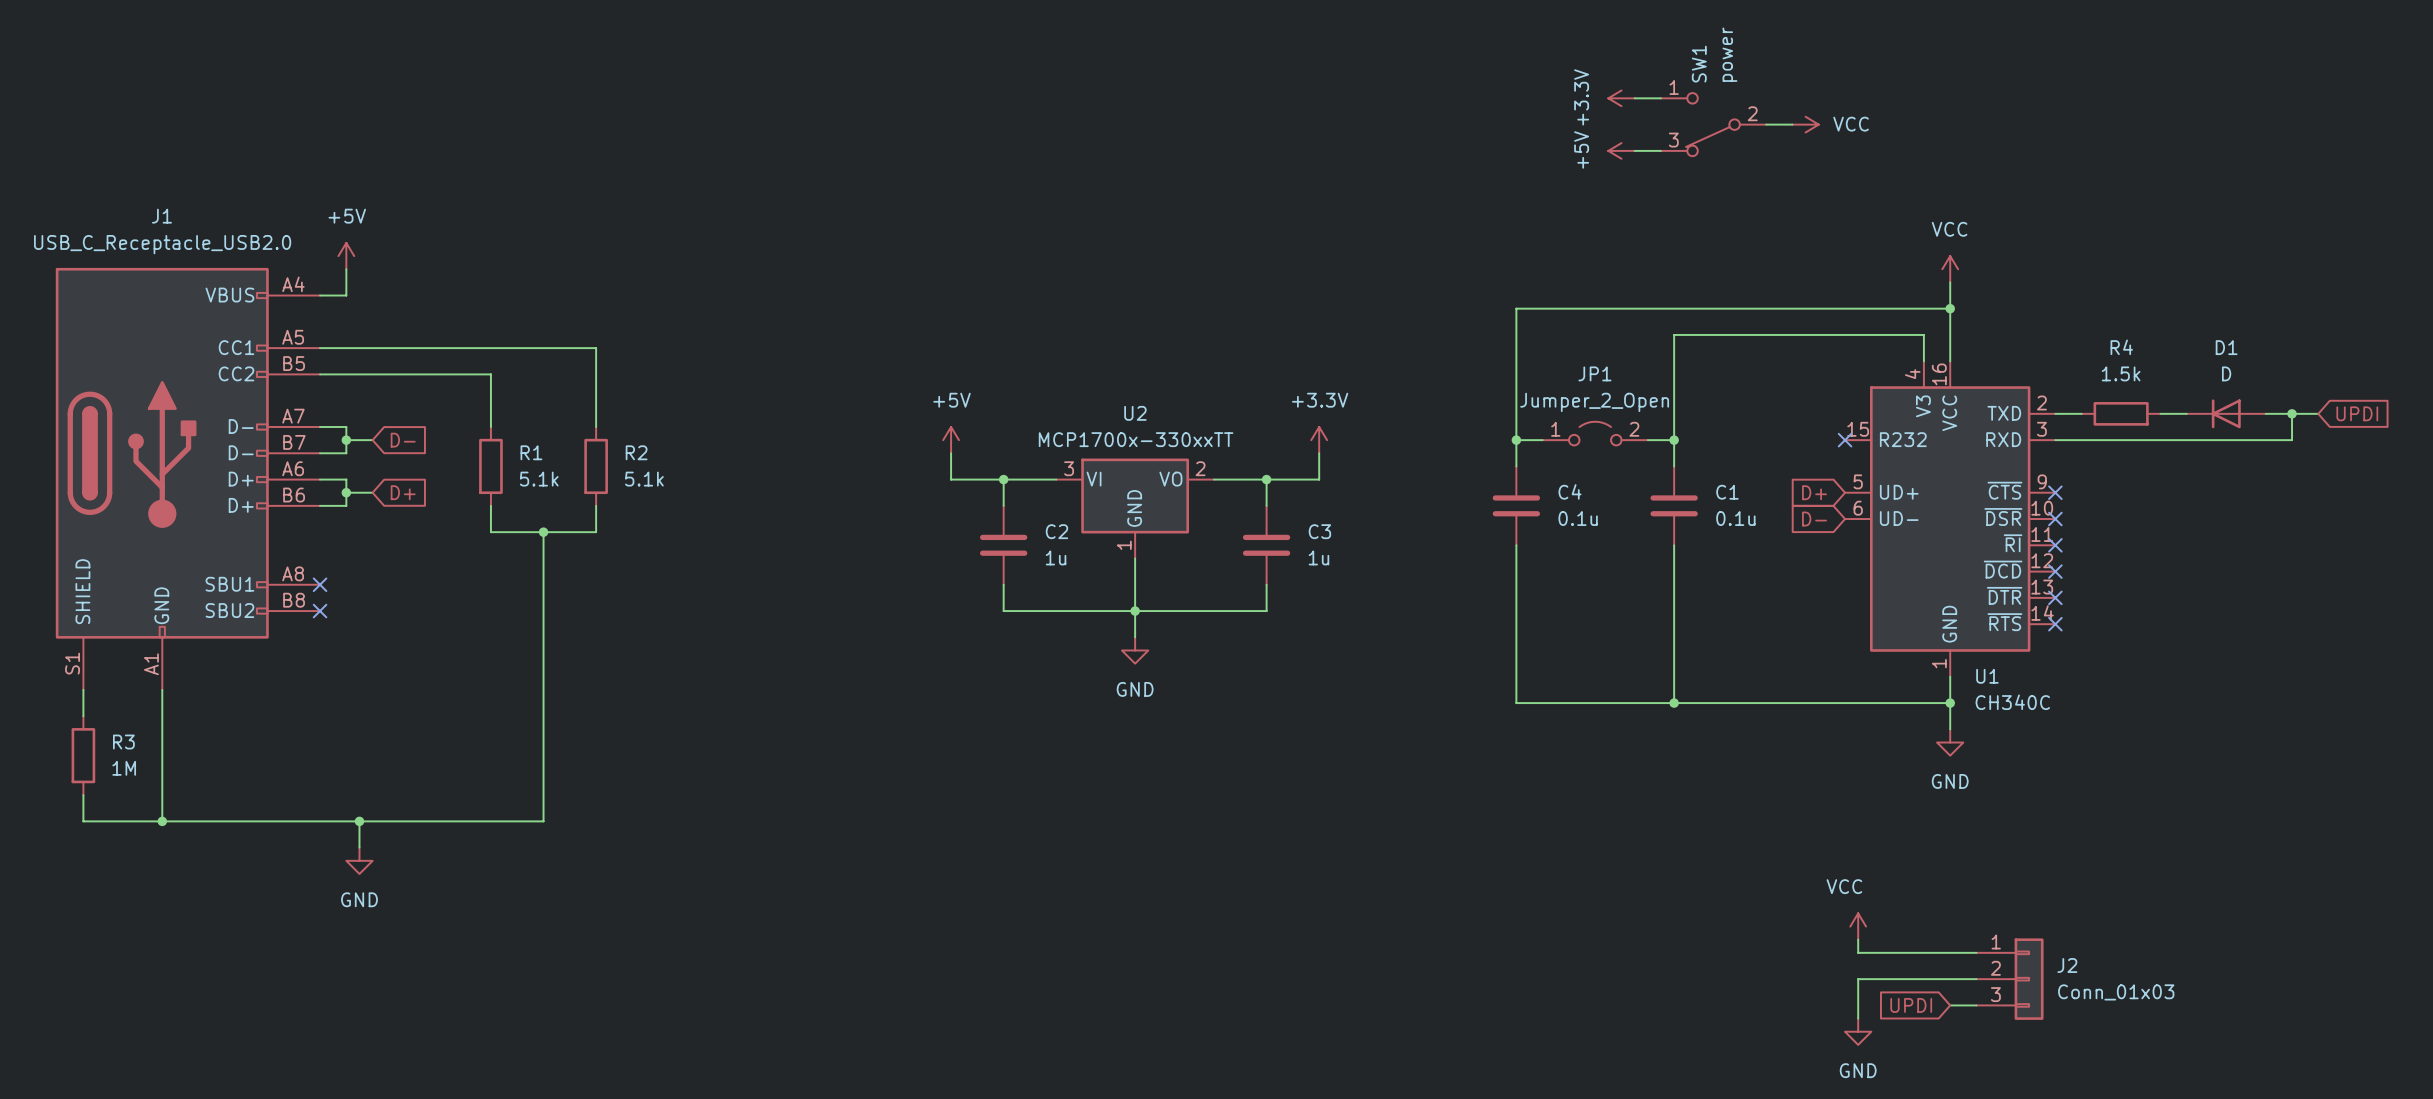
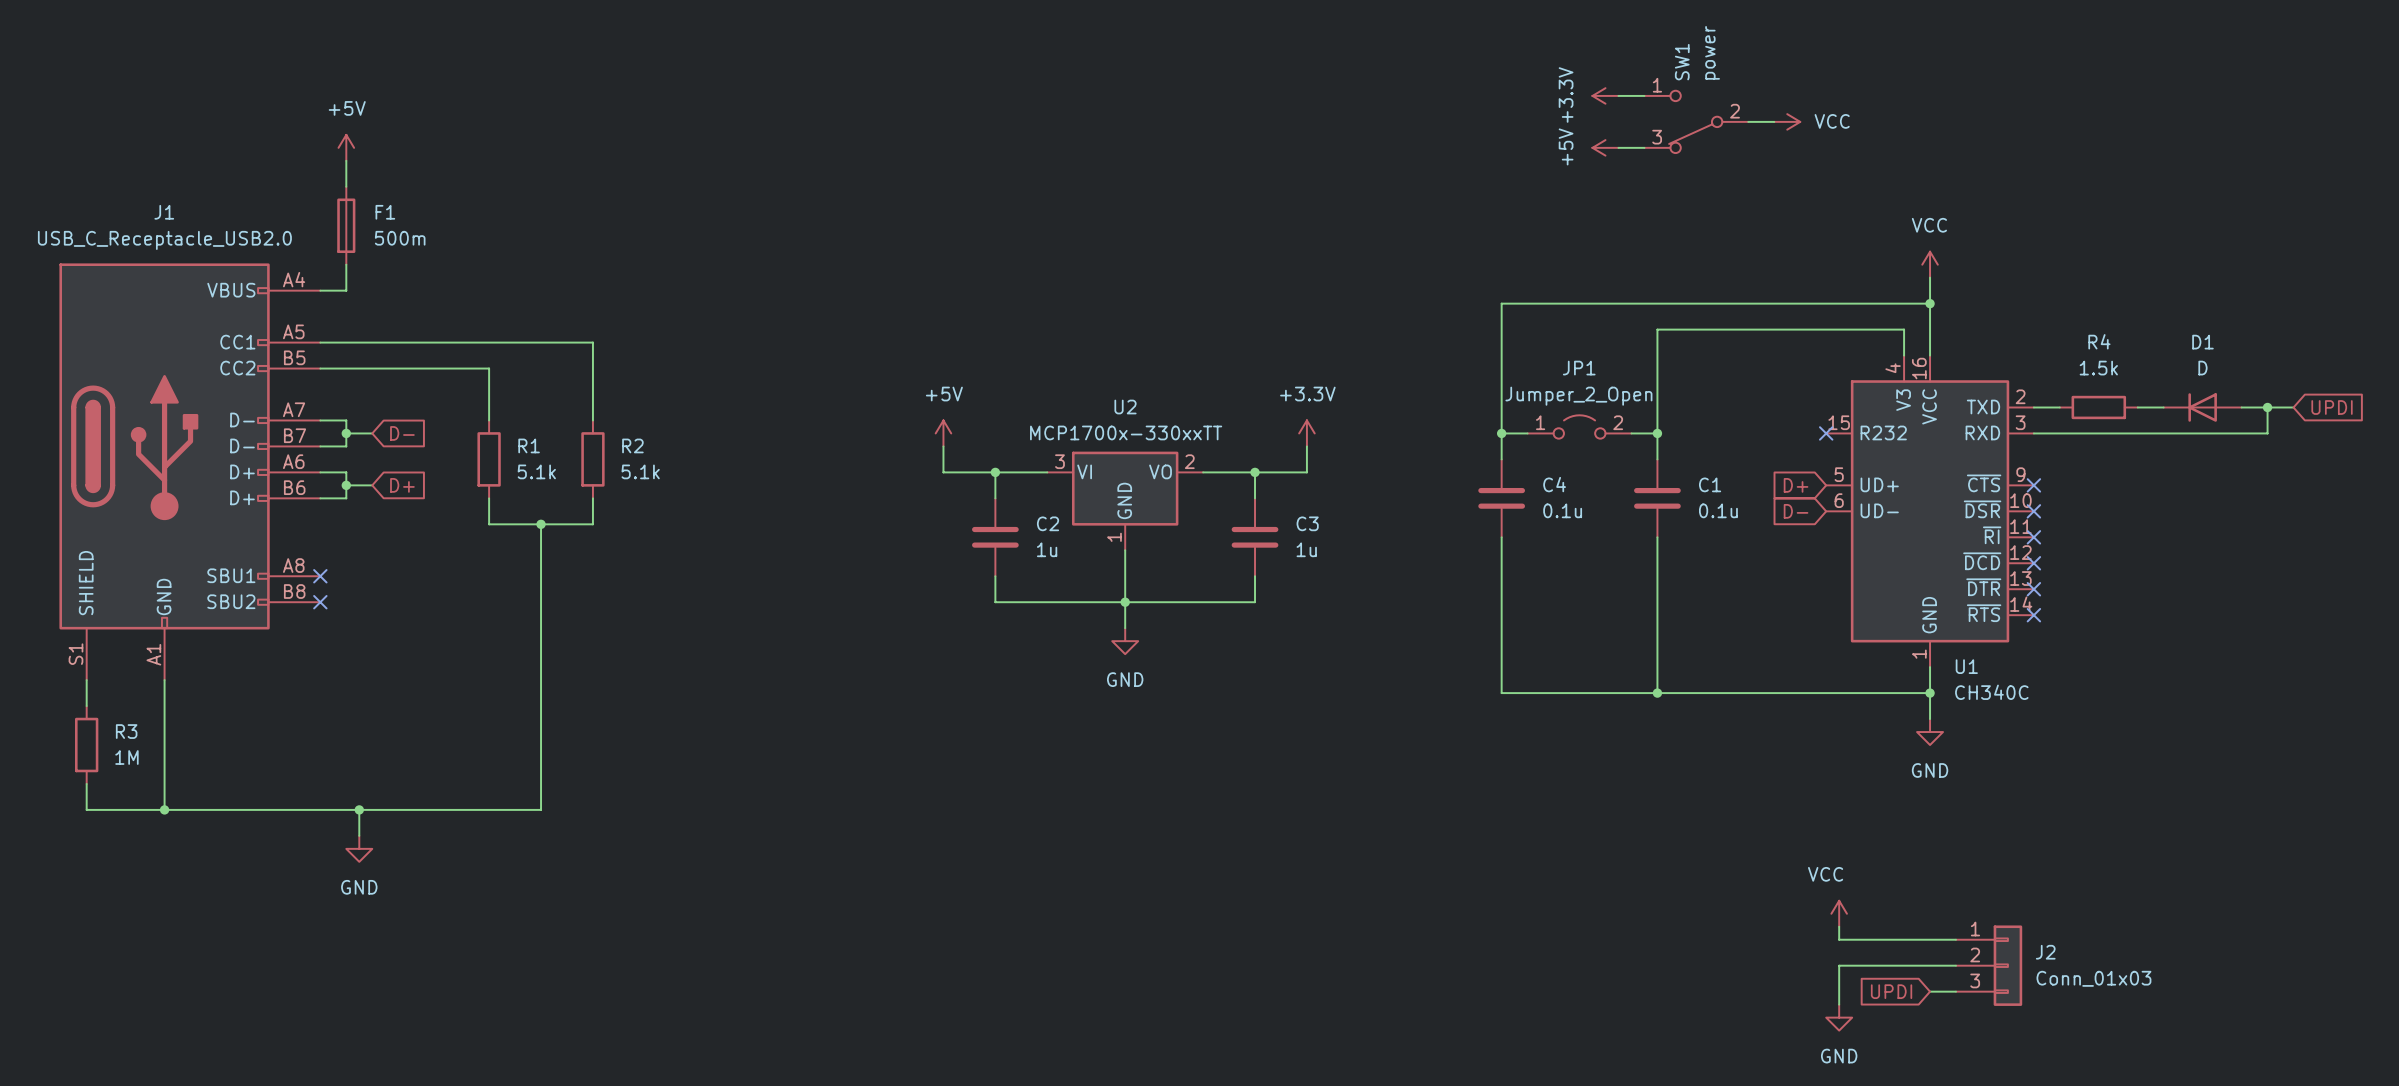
wire: none -> (346, 160) (346, 186)
F1: none -> 500m (346, 225)
power symbol position: +5V (346, 256) -> +5V (346, 147)

